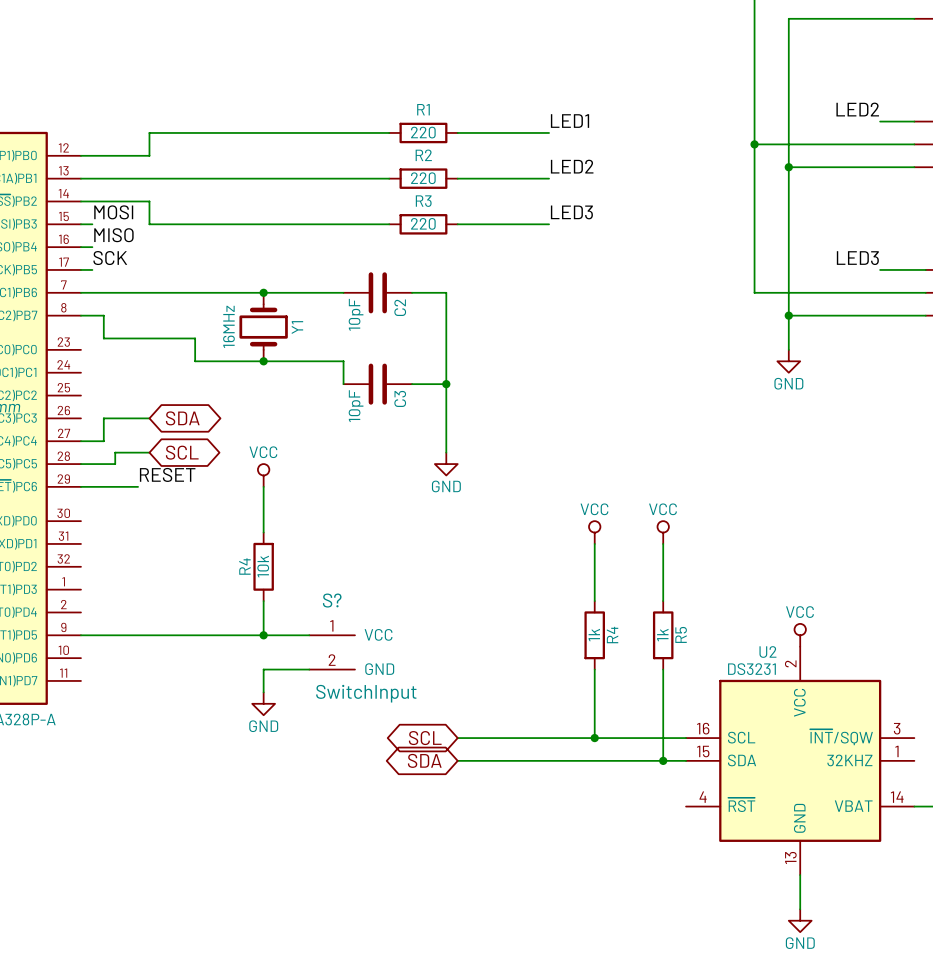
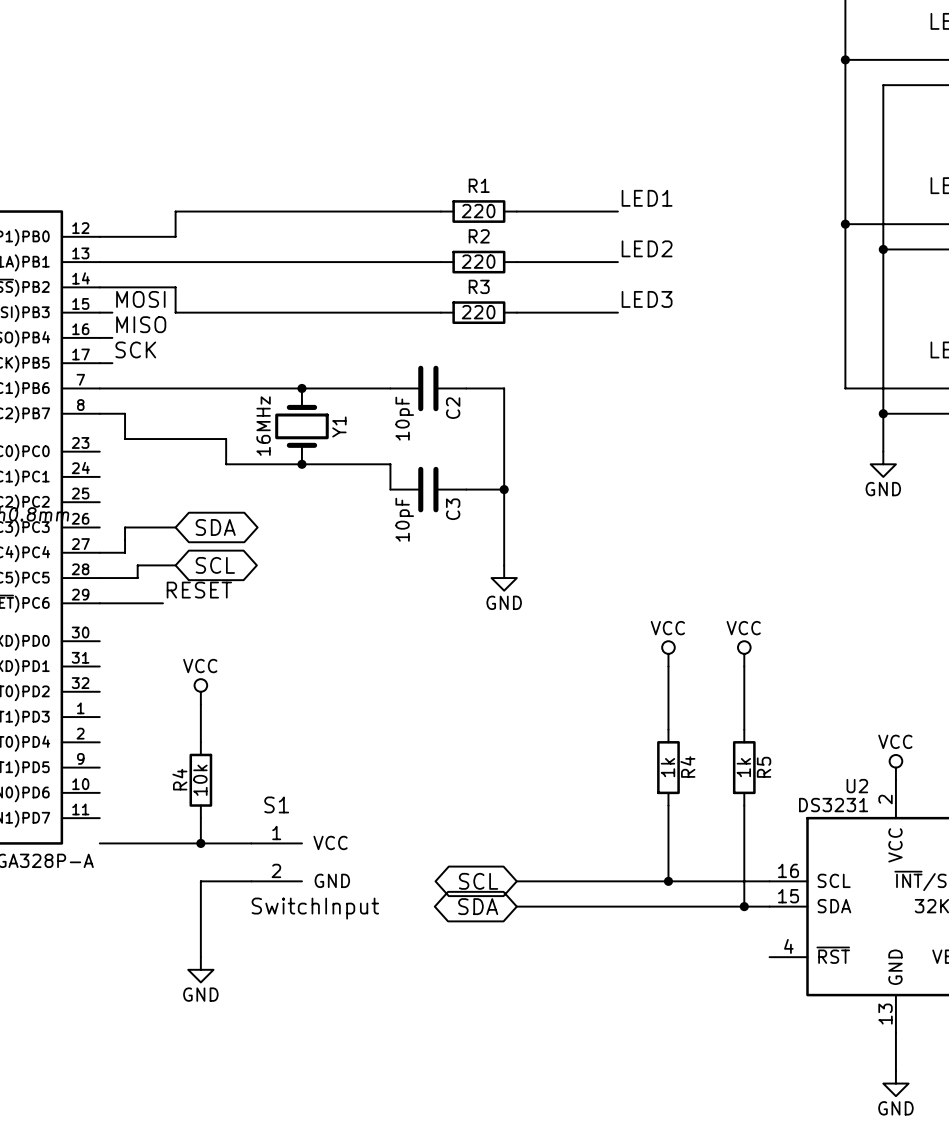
power symbol position: VCC (263, 475) -> VCC (200, 691)
wire: (263, 486) (263, 532) -> none
R4 position: (263, 566) -> (200, 780)
wire: (263, 601) (263, 635) -> (200, 704) (200, 742)
wire: (80, 635) (309, 635) -> none
junction: (263, 635) -> none
S?: SwitchInput (332, 652) -> none
wire: (309, 669) (263, 669) (263, 692) -> none
wire: none -> (200, 818) (200, 843)
wire: none -> (99, 843) (251, 843)
junction: none -> (200, 843)
power symbol position: GND (263, 703) -> GND (200, 969)
S1: none -> SwitchInput (276, 862)
wire: none -> (251, 881) (200, 881) (200, 957)

